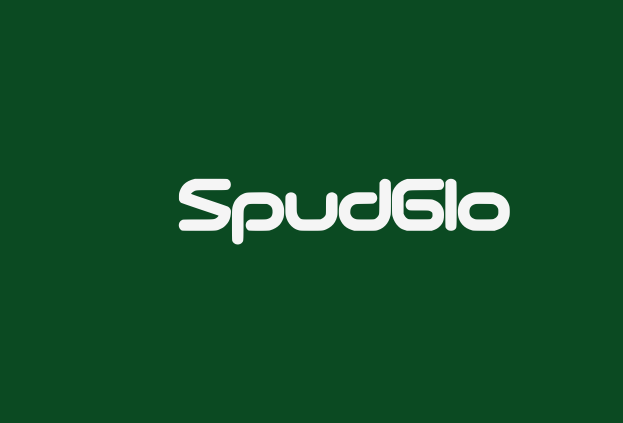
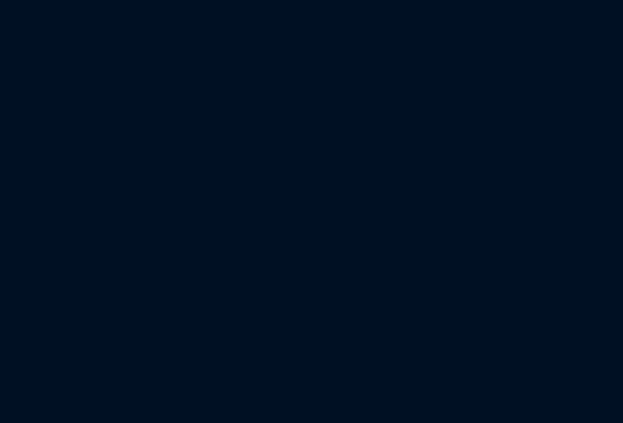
drawing: [178, 178, 510, 245] -> none

